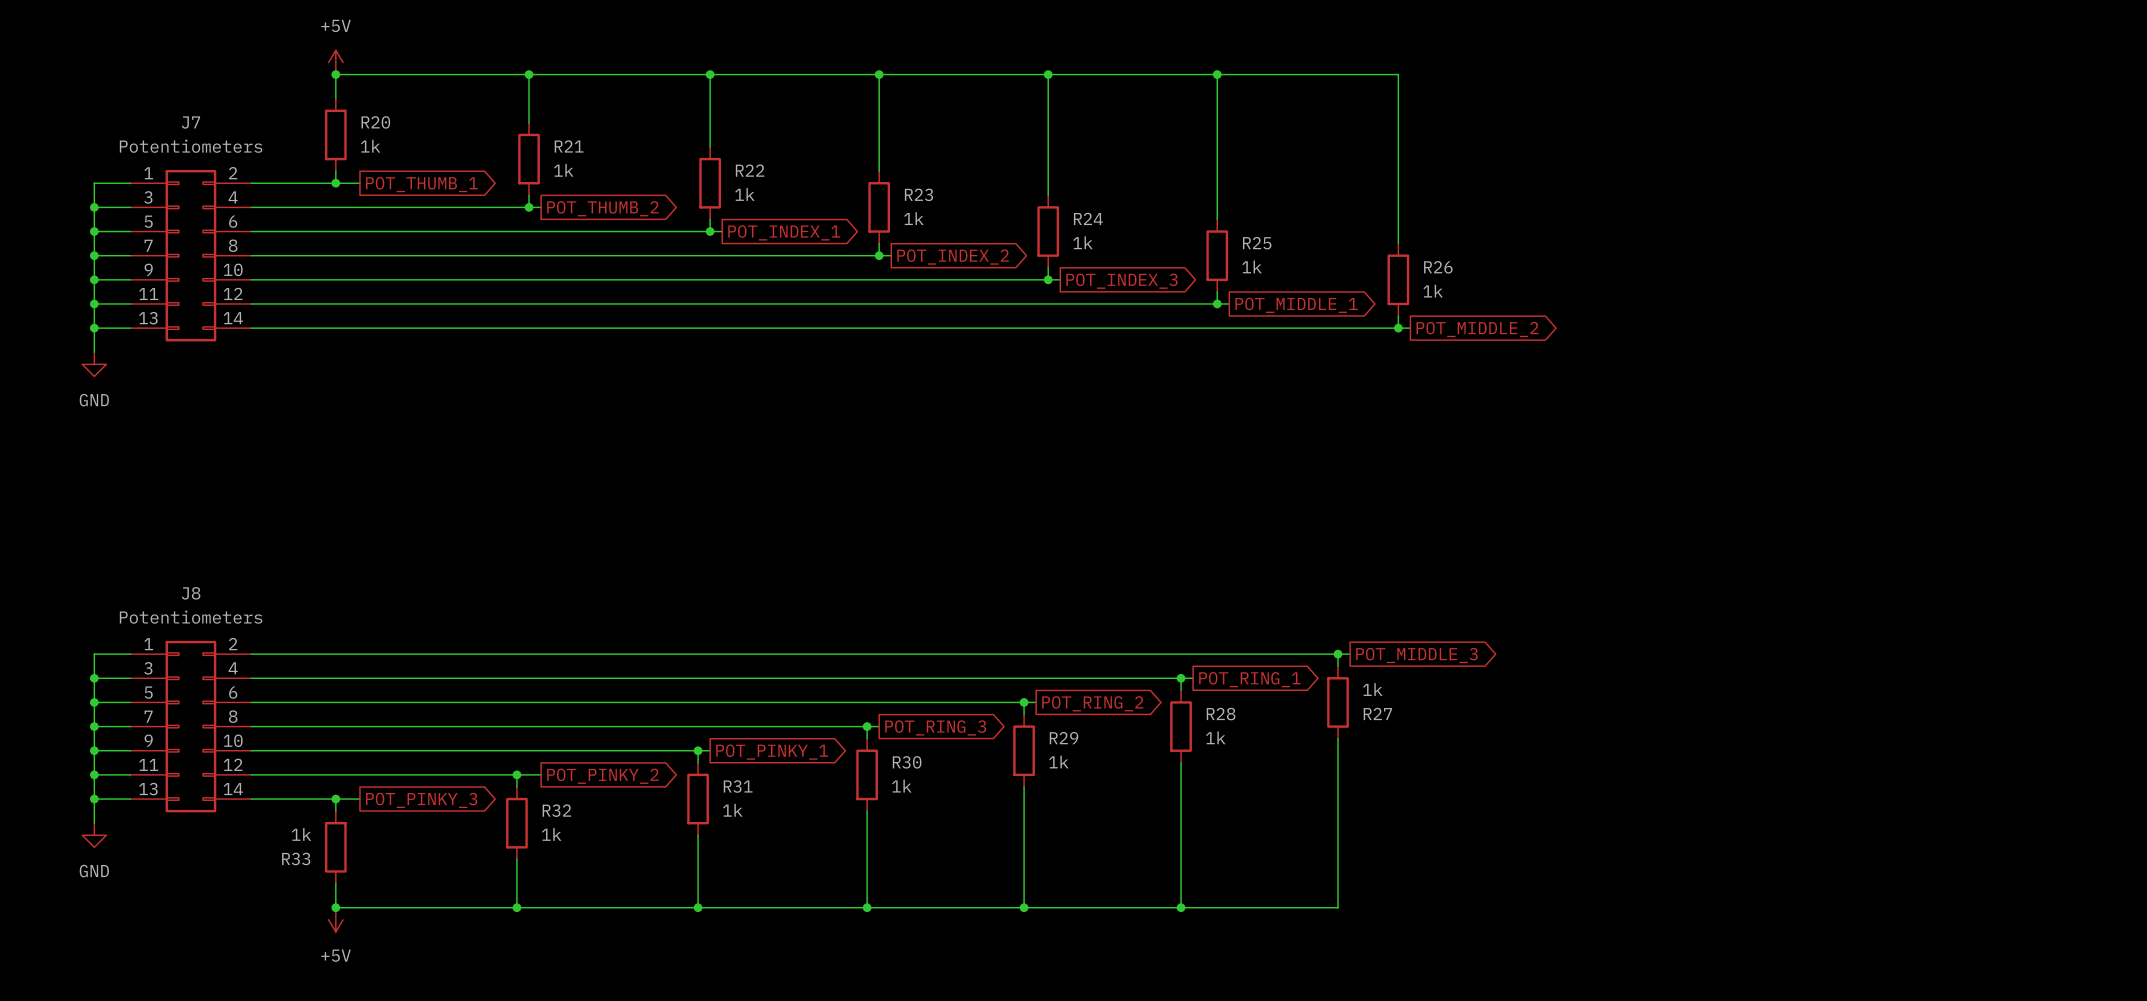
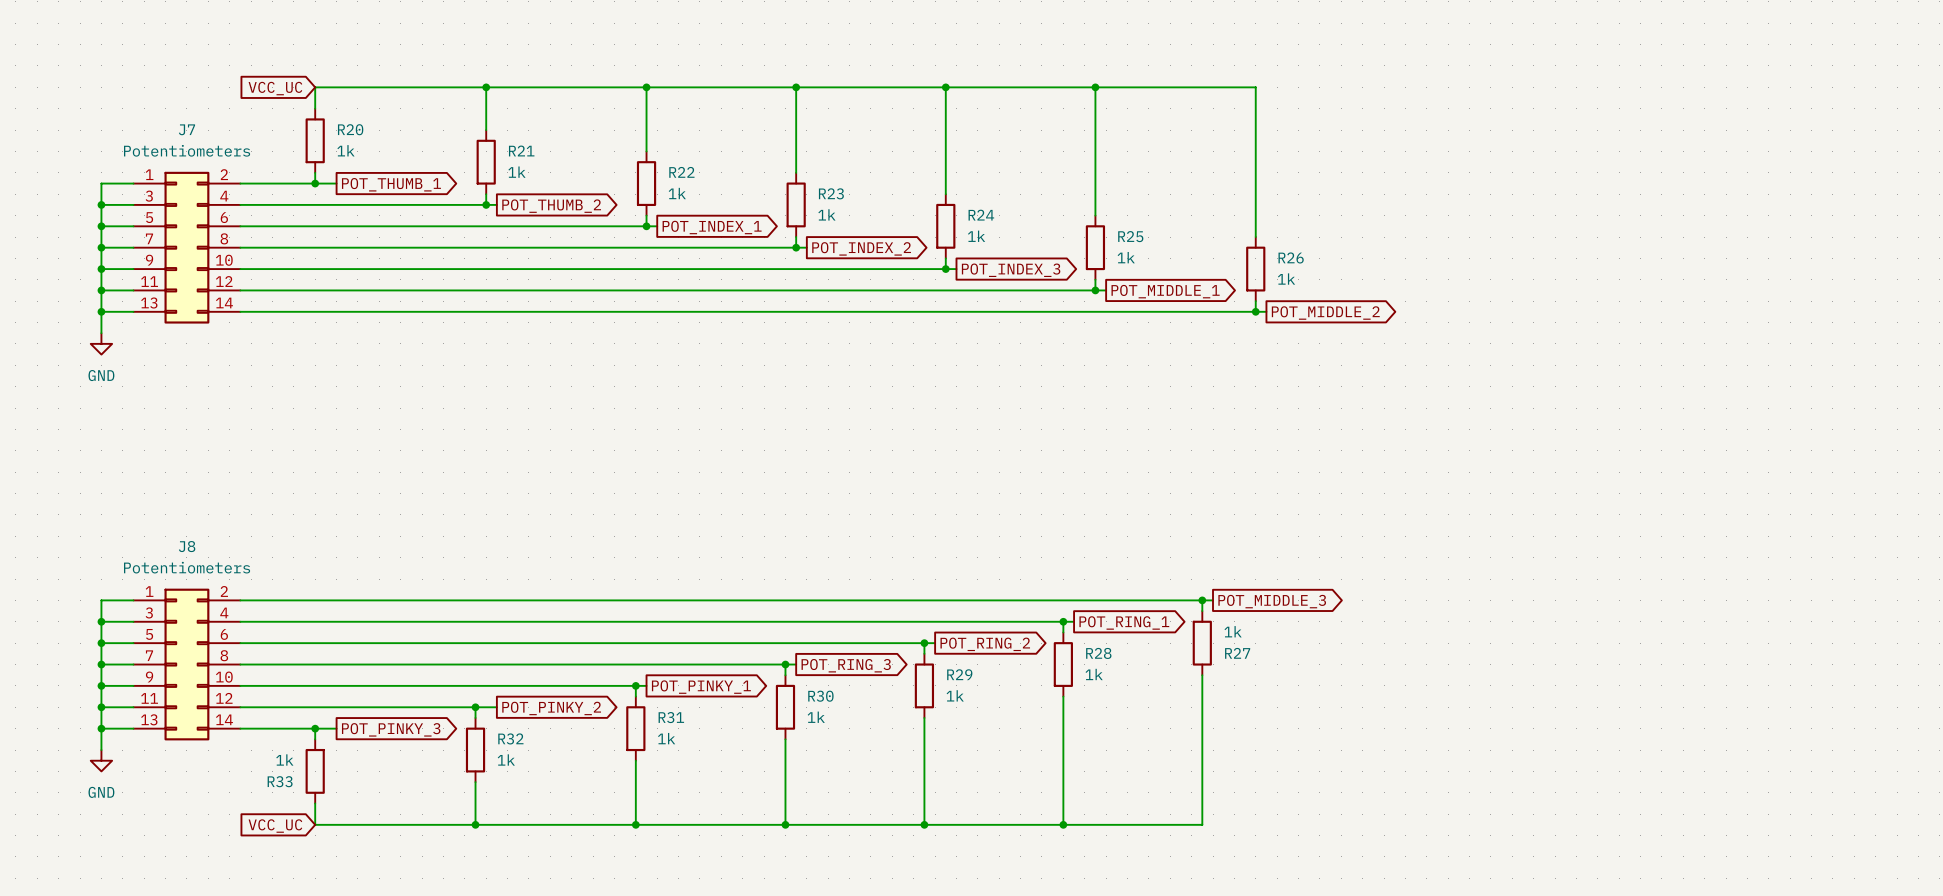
power symbol: +5V (335, 62) -> none
junction: (335, 74) -> none
global label: none -> VCC_UC (275, 88)
junction: (335, 907) -> none
global label: none -> VCC_UC (275, 826)
power symbol: +5V (335, 919) -> none

